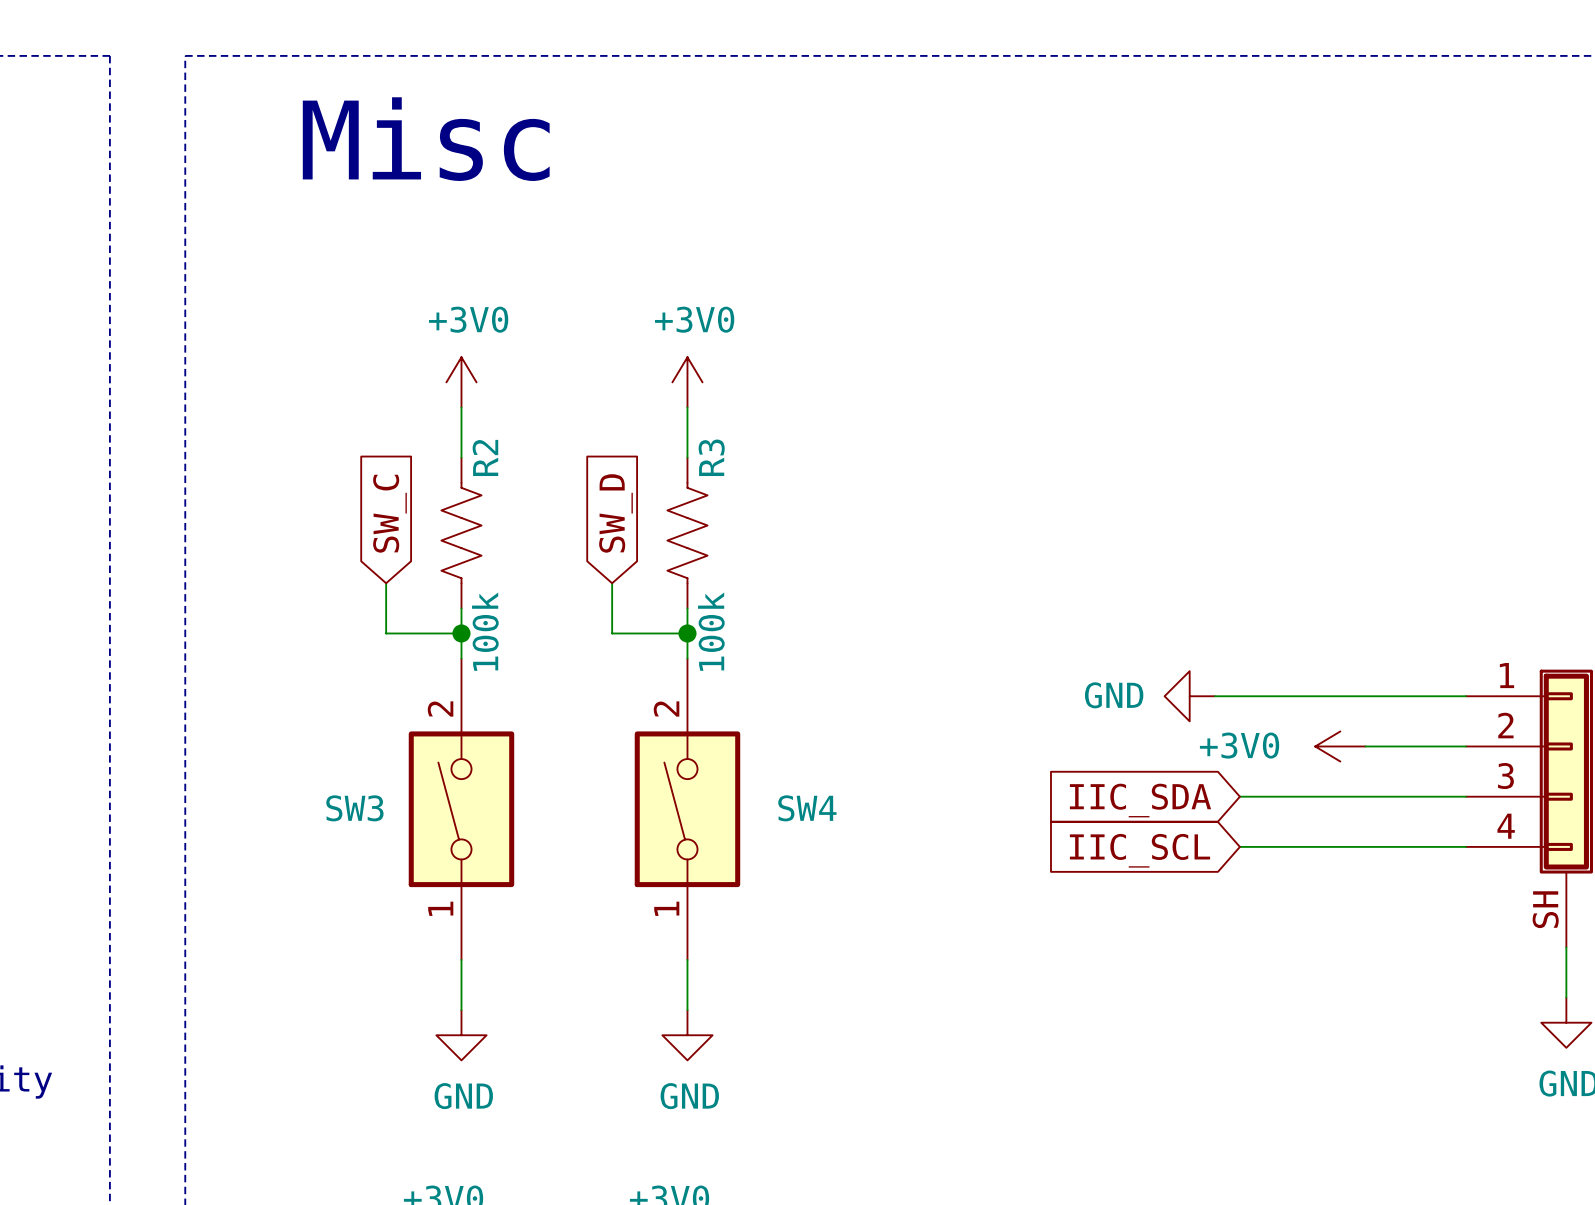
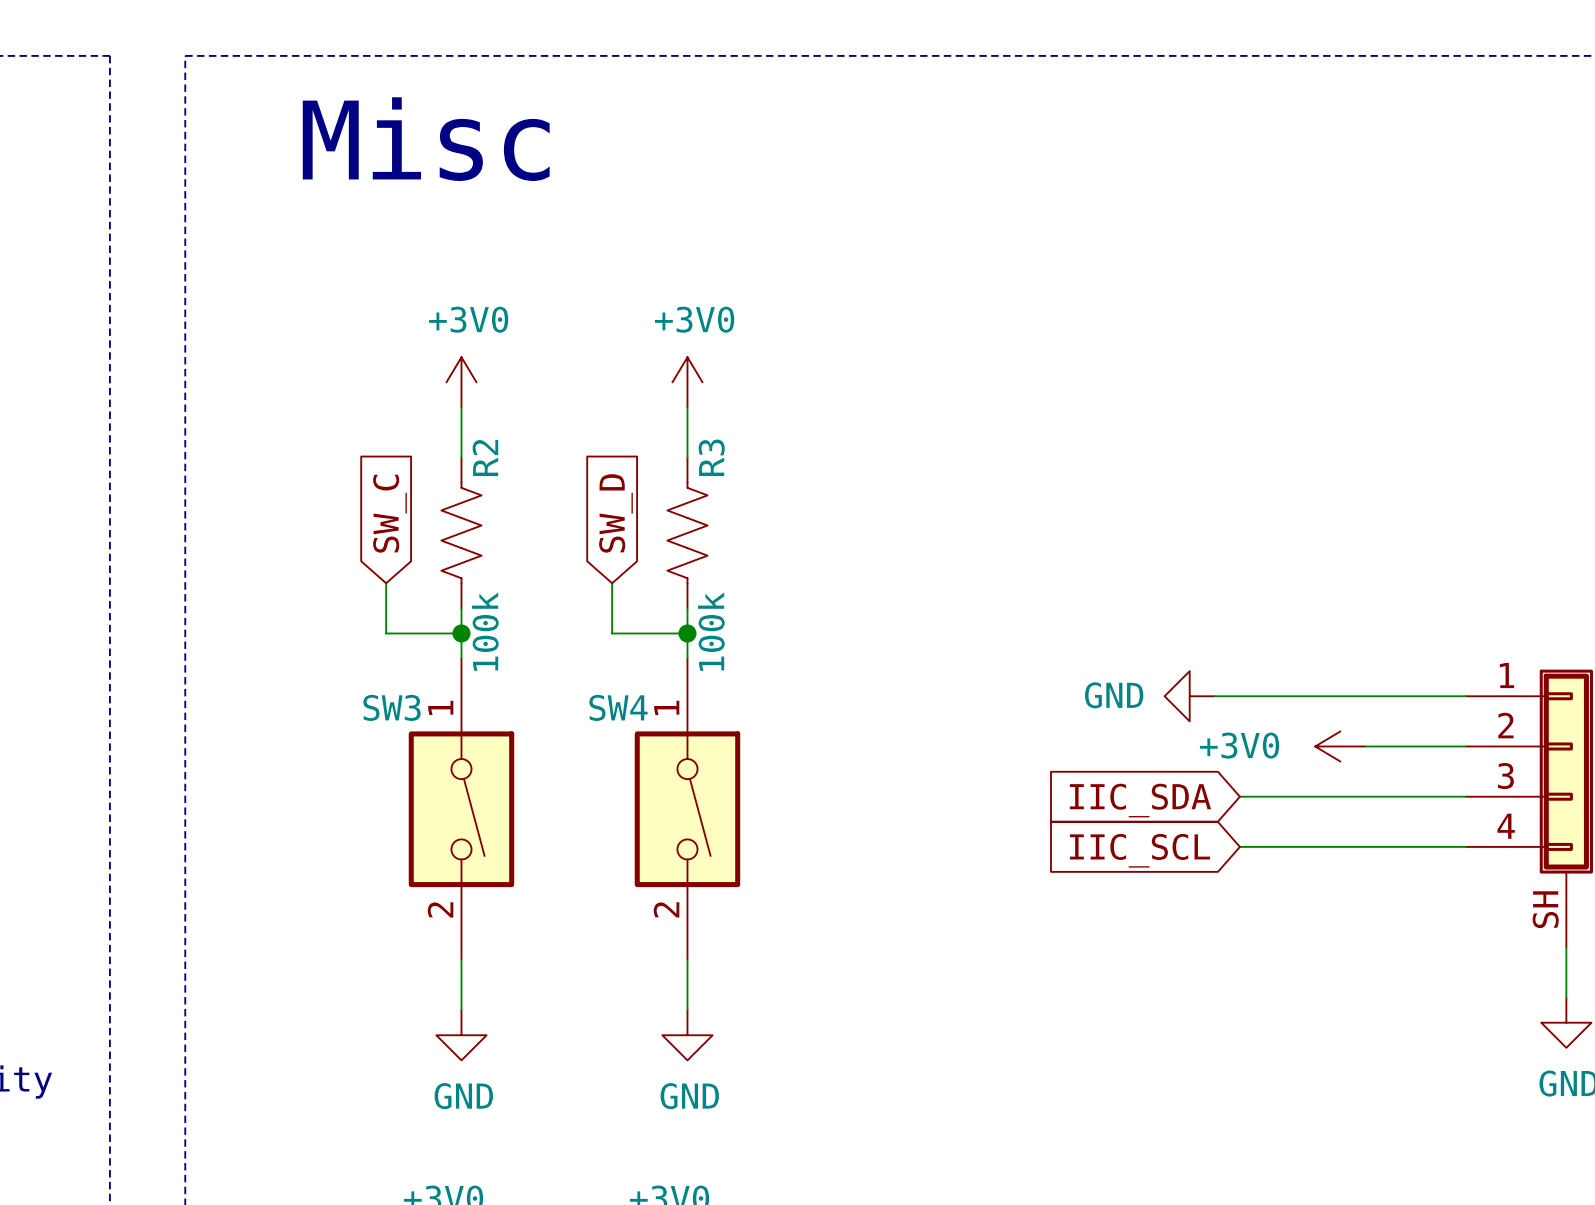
SW3 name position: SW3 (354, 808) -> SW3 (392, 707)
SW4 name position: SW4 (807, 808) -> SW4 (618, 707)
SW3 rotation: 0° (461, 809) -> 180° (461, 809)
SW4 rotation: 0° (687, 809) -> 180° (687, 809)

